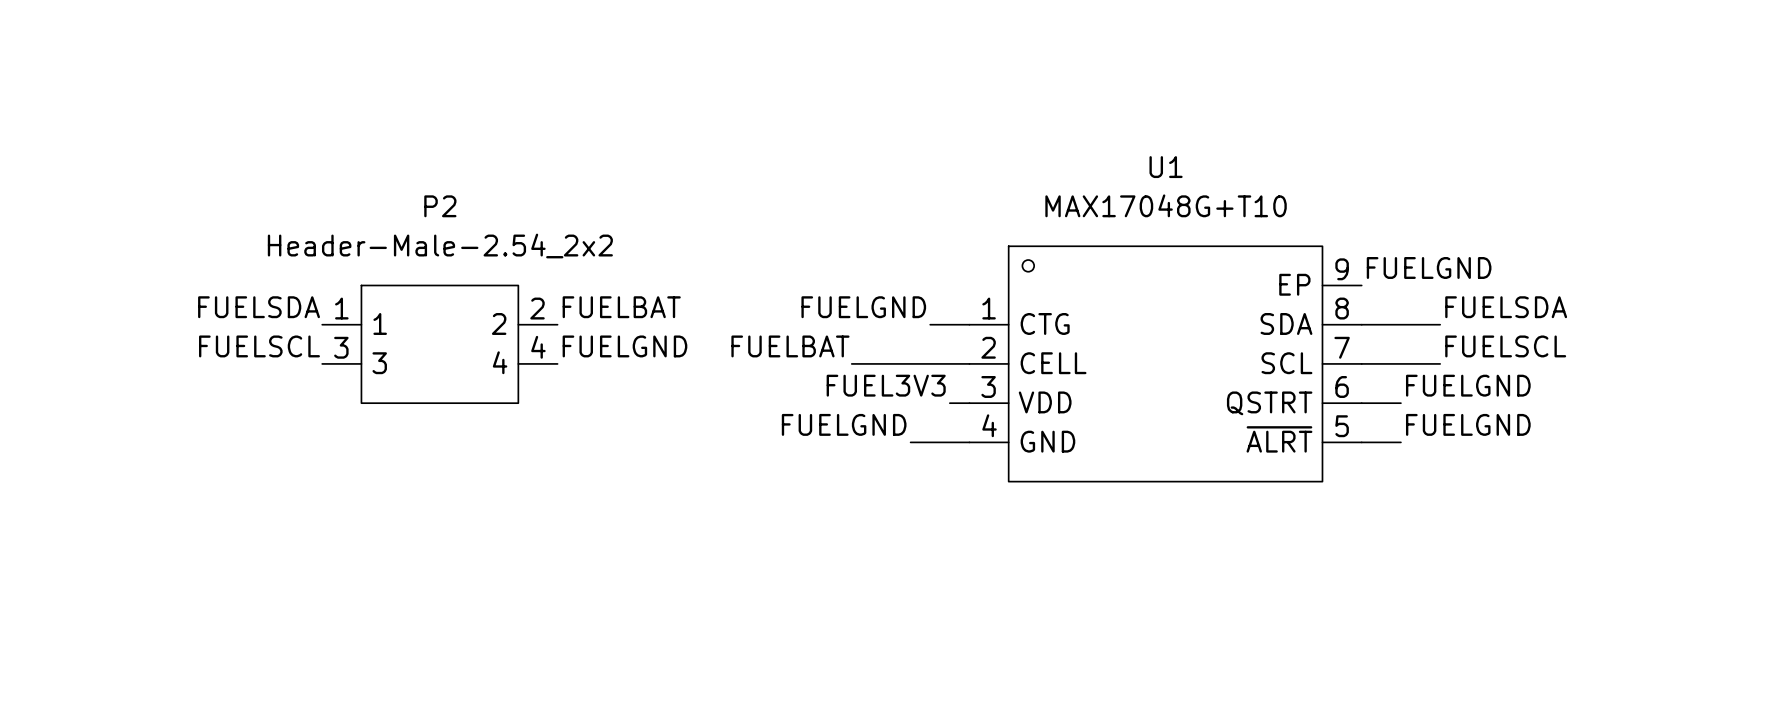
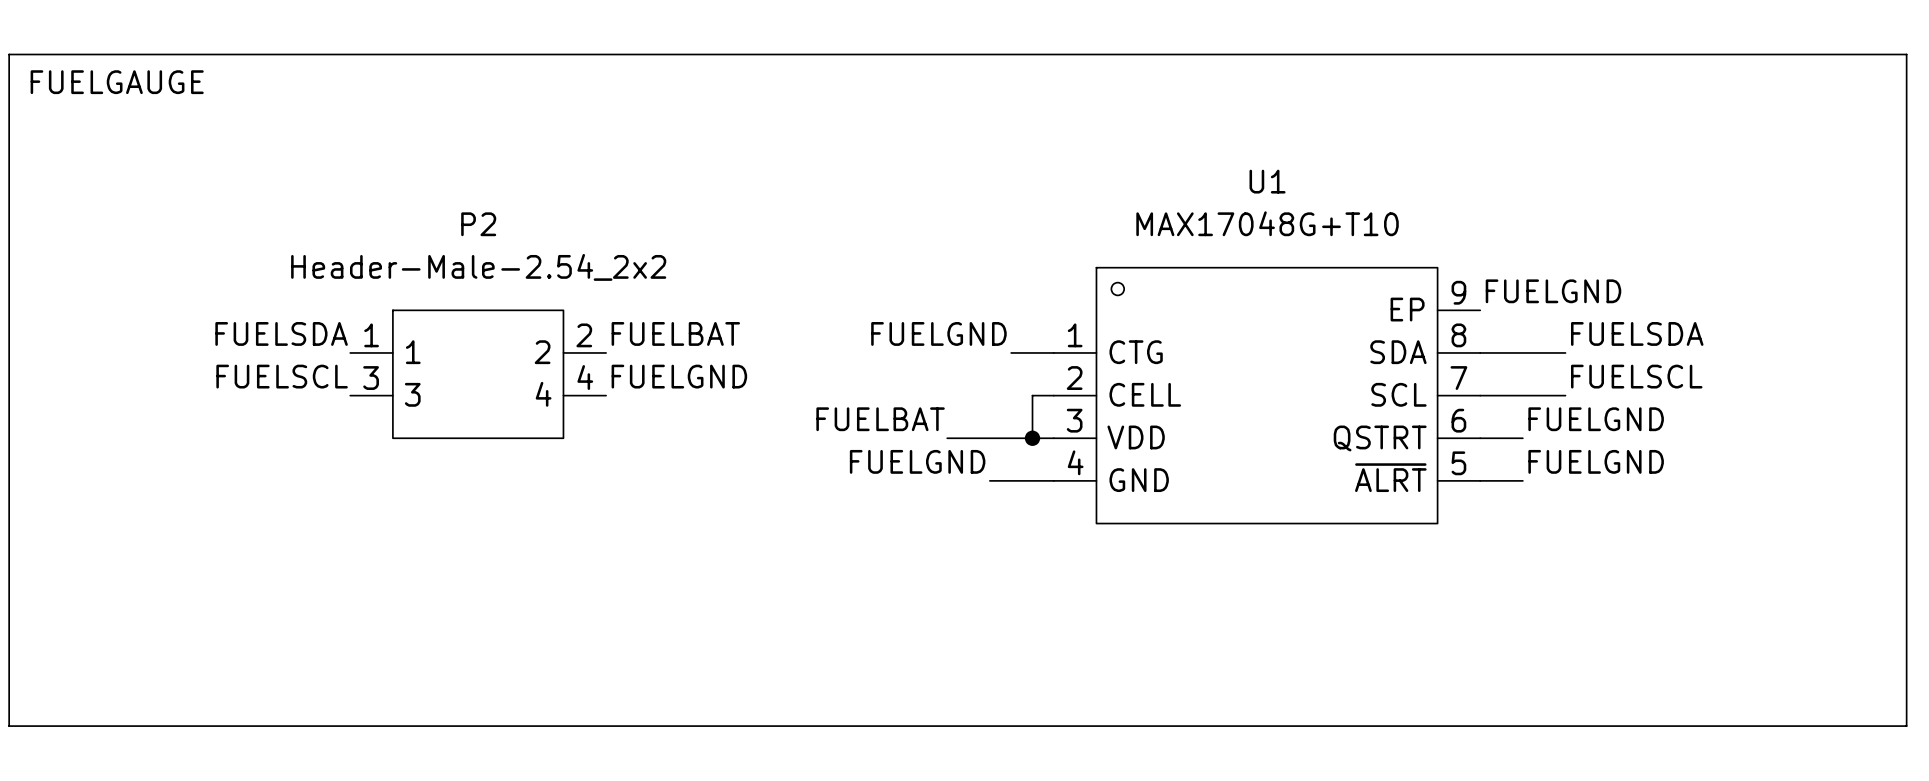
line: none -> (9, 54) (1906, 54) (1906, 726) (9, 726) (9, 54)
text: none -> FUELGAUGE (117, 82)
label position: FUELBAT (790, 346) -> FUELBAT (880, 419)
wire: (851, 363) (949, 363) -> (947, 438) (1032, 438) (1032, 395)
label: FUEL3V3 (886, 385) -> none
junction: none -> (1032, 438)

